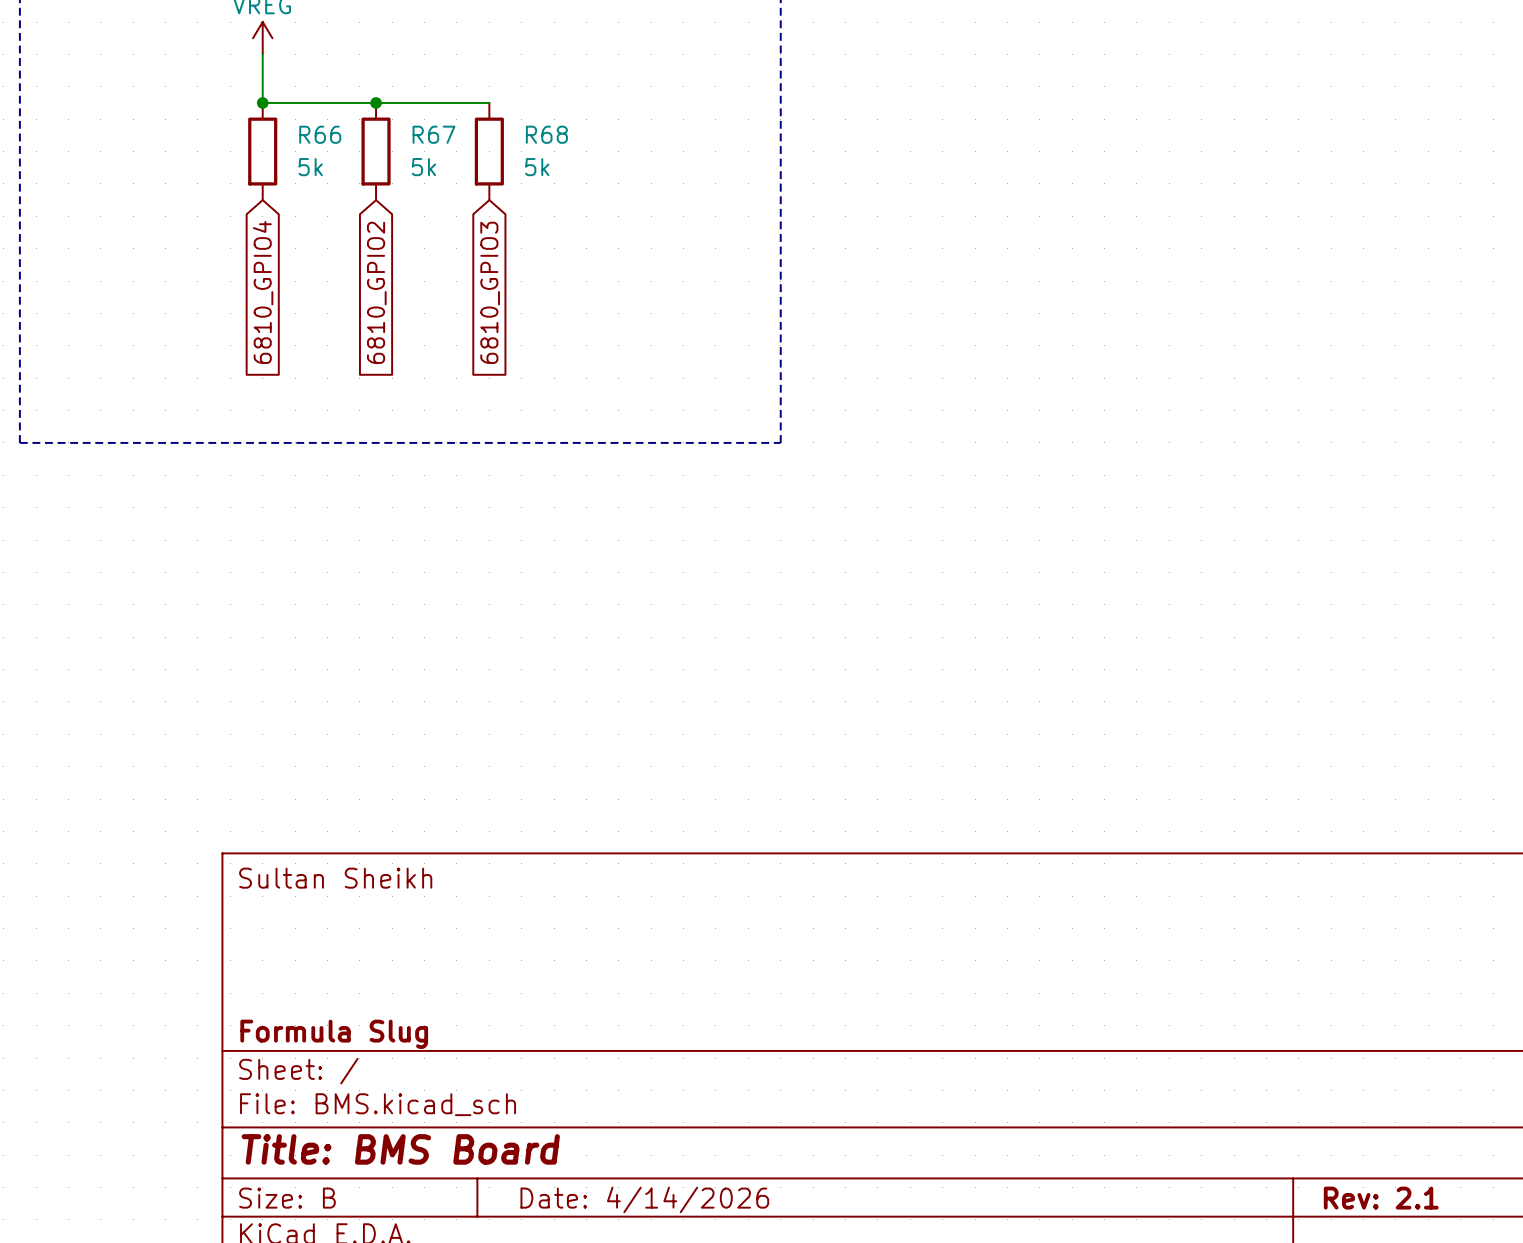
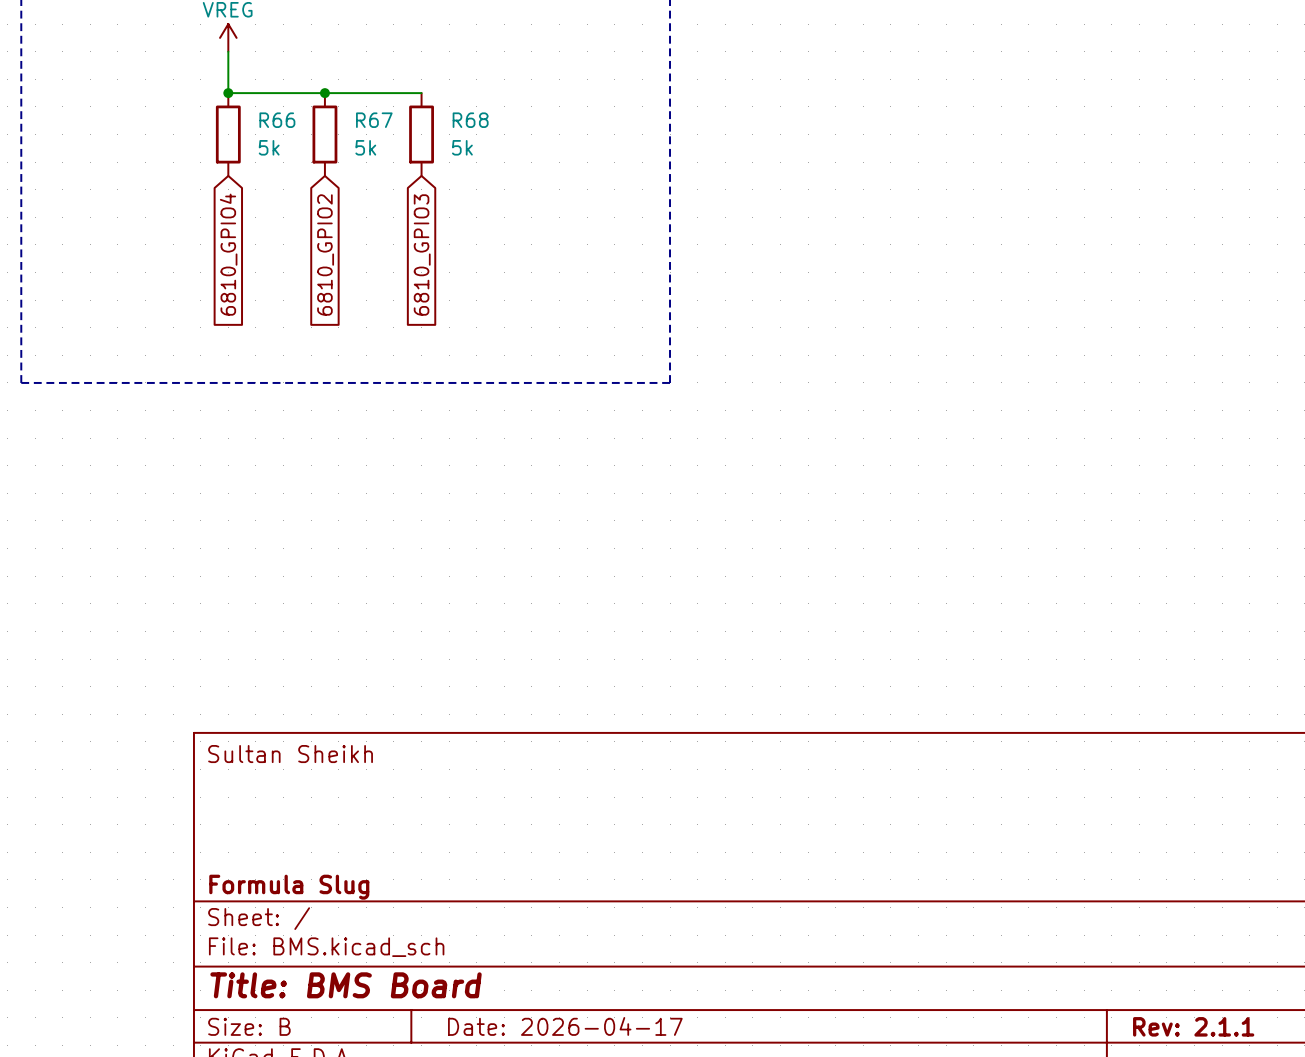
title block: Rev: 2.1 (1381, 1198) -> Rev: 2.1.1 (1193, 1026)
title block: Date: 4/14/2026 (644, 1199) -> Date: 2026-04-17 (565, 1026)

